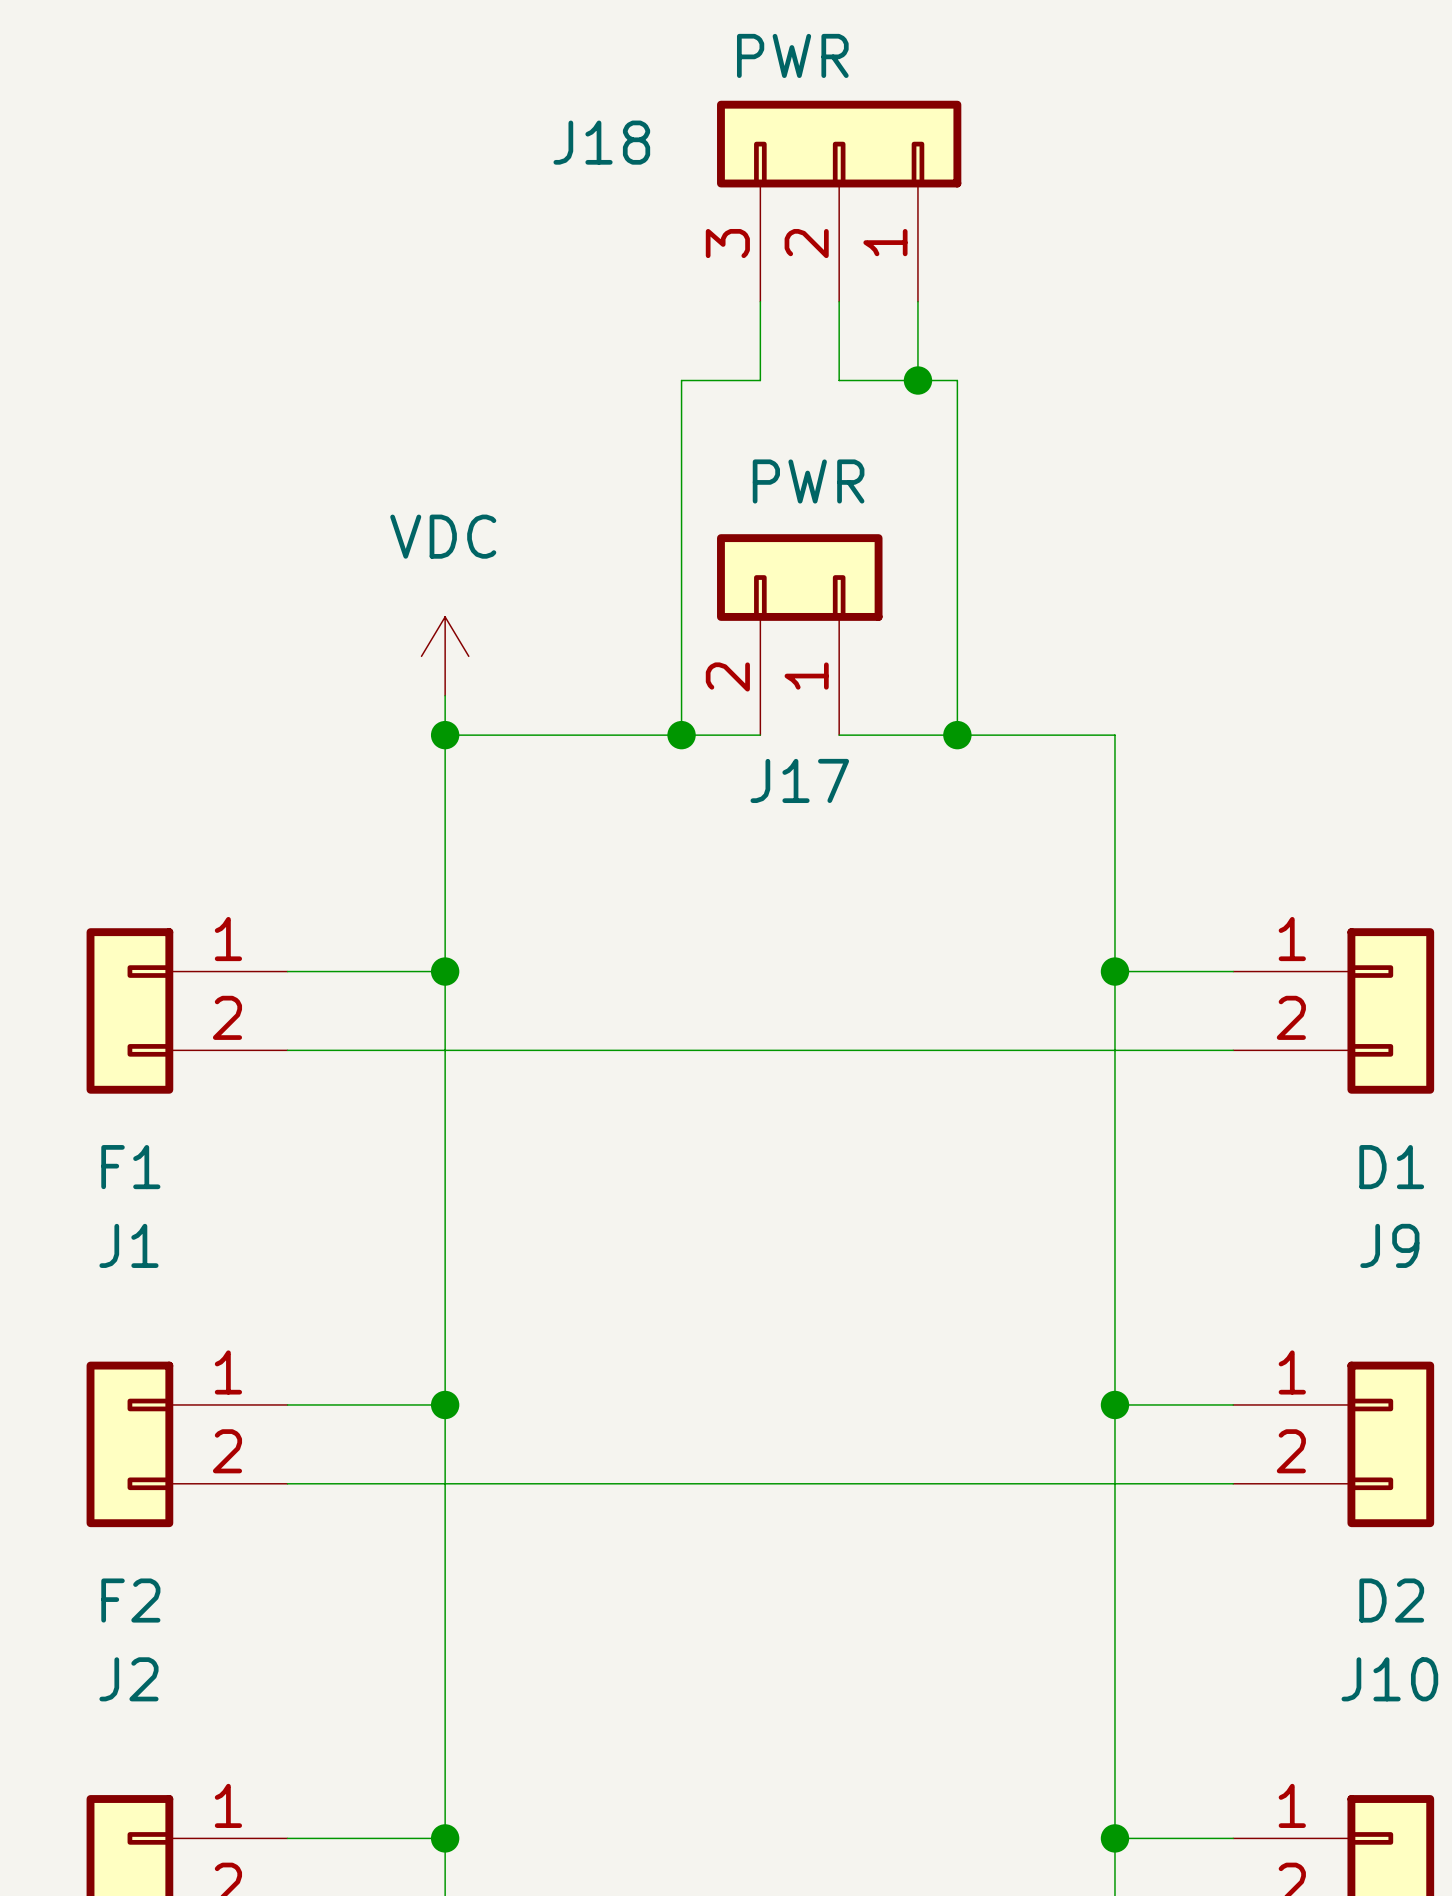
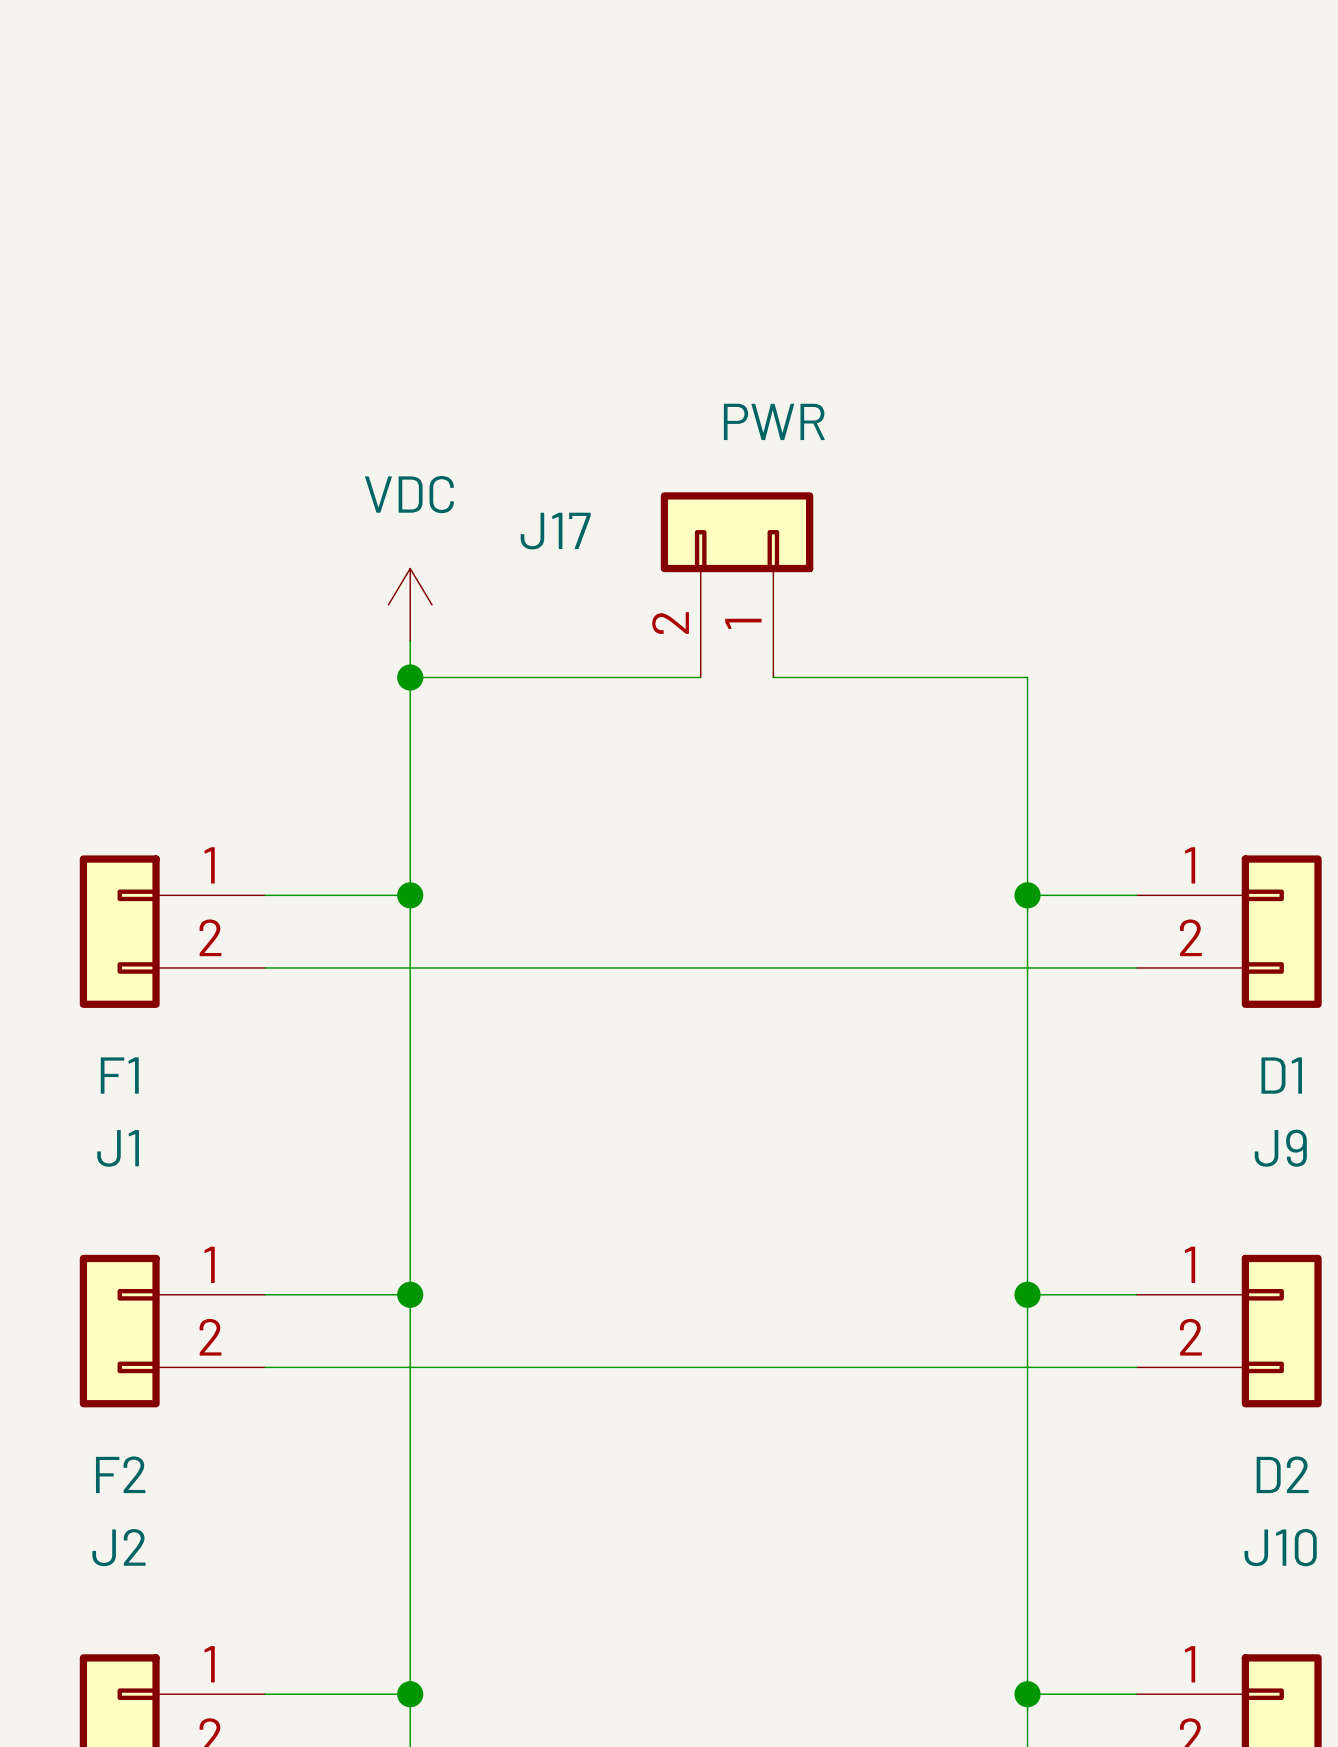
J18: PWR (839, 201) -> none
wire: (760, 301) (760, 380) (681, 380) (681, 735) -> none
wire: (839, 301) (839, 380) (957, 380) (957, 735) -> none
wire: (917, 301) (917, 380) -> none
junction: (917, 380) -> none
J17 value position: PWR (808, 481) -> PWR (774, 421)
junction: (681, 735) -> none
junction: (957, 735) -> none
J17 name position: J17 (799, 780) -> J17 (555, 531)

